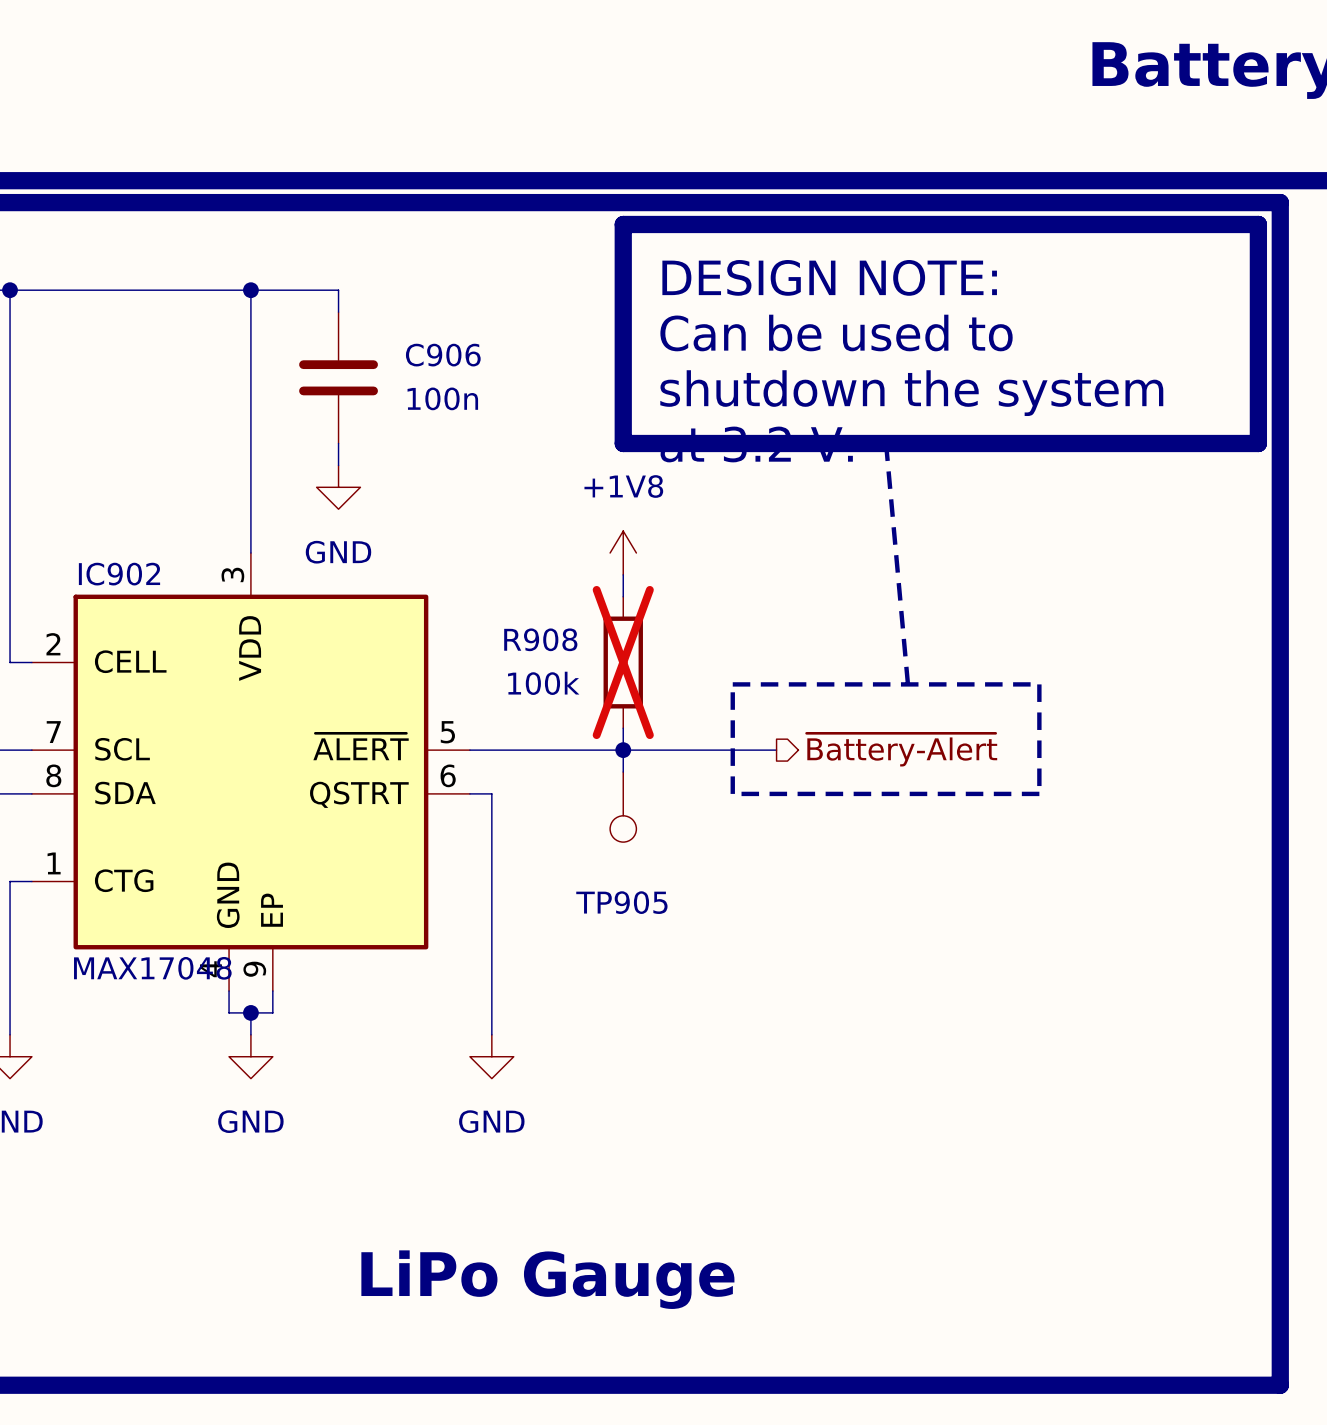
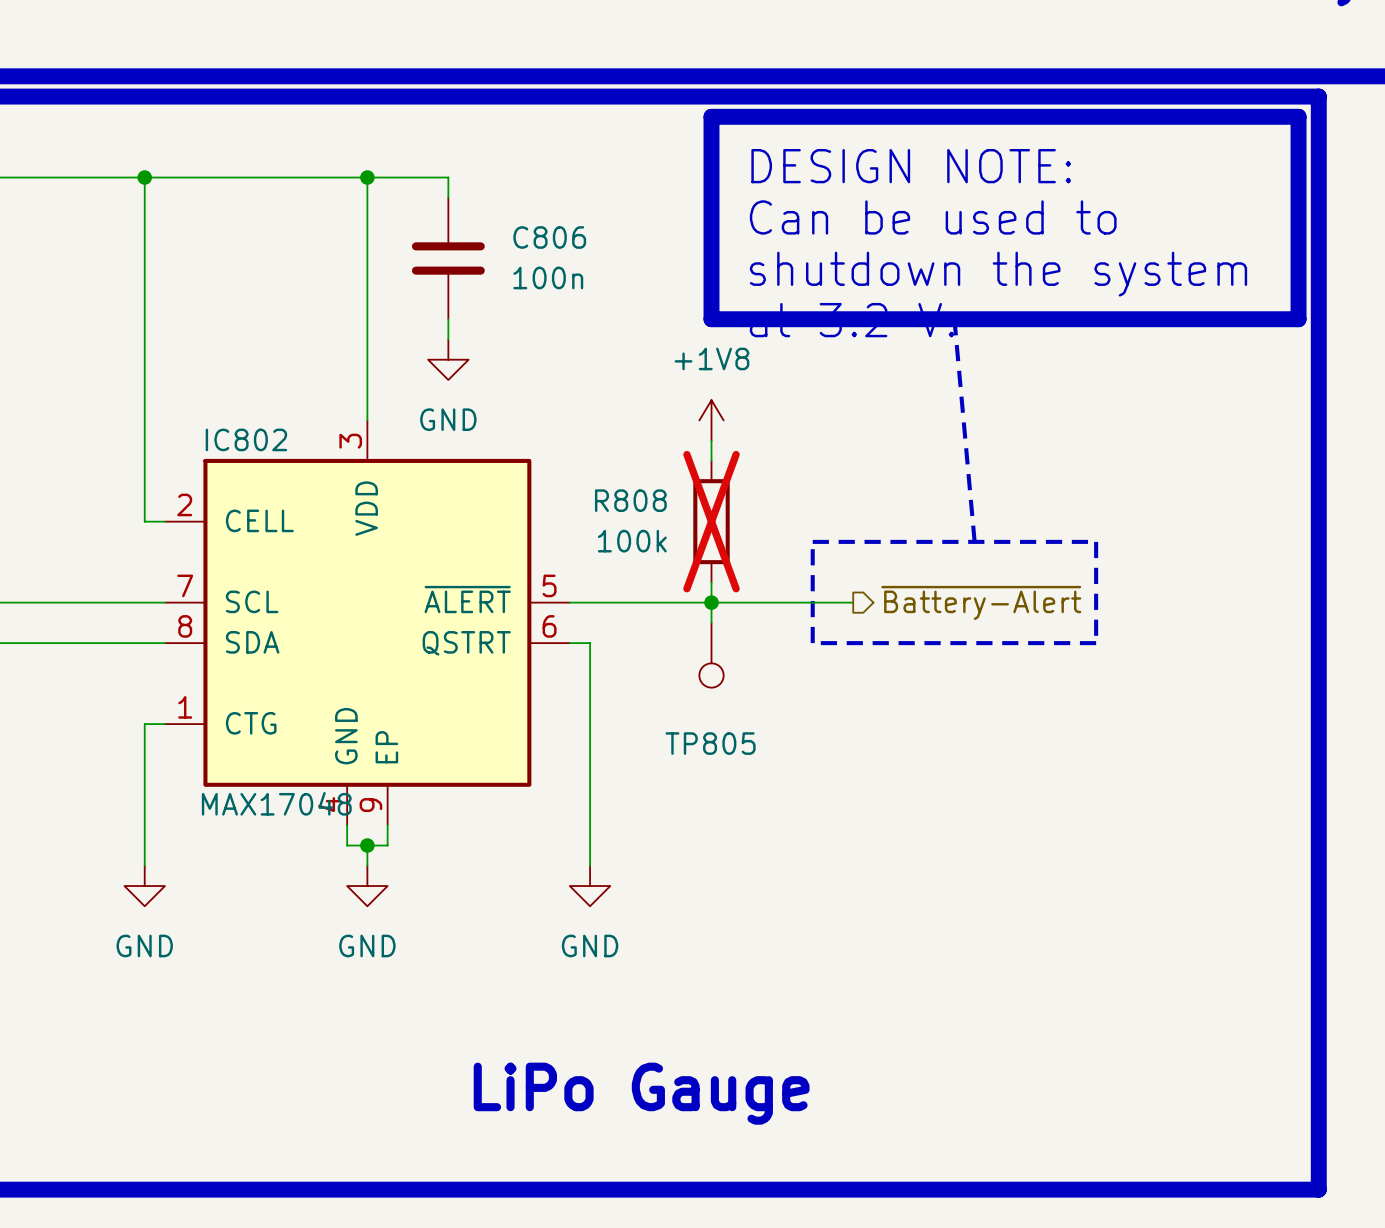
C906 name: C906 (443, 355) -> C806 (549, 237)
IC902 name: IC902 (119, 574) -> IC802 (246, 439)
R908 name: R908 (540, 639) -> R808 (630, 500)
TP905 name: TP905 (621, 902) -> TP805 (710, 743)

